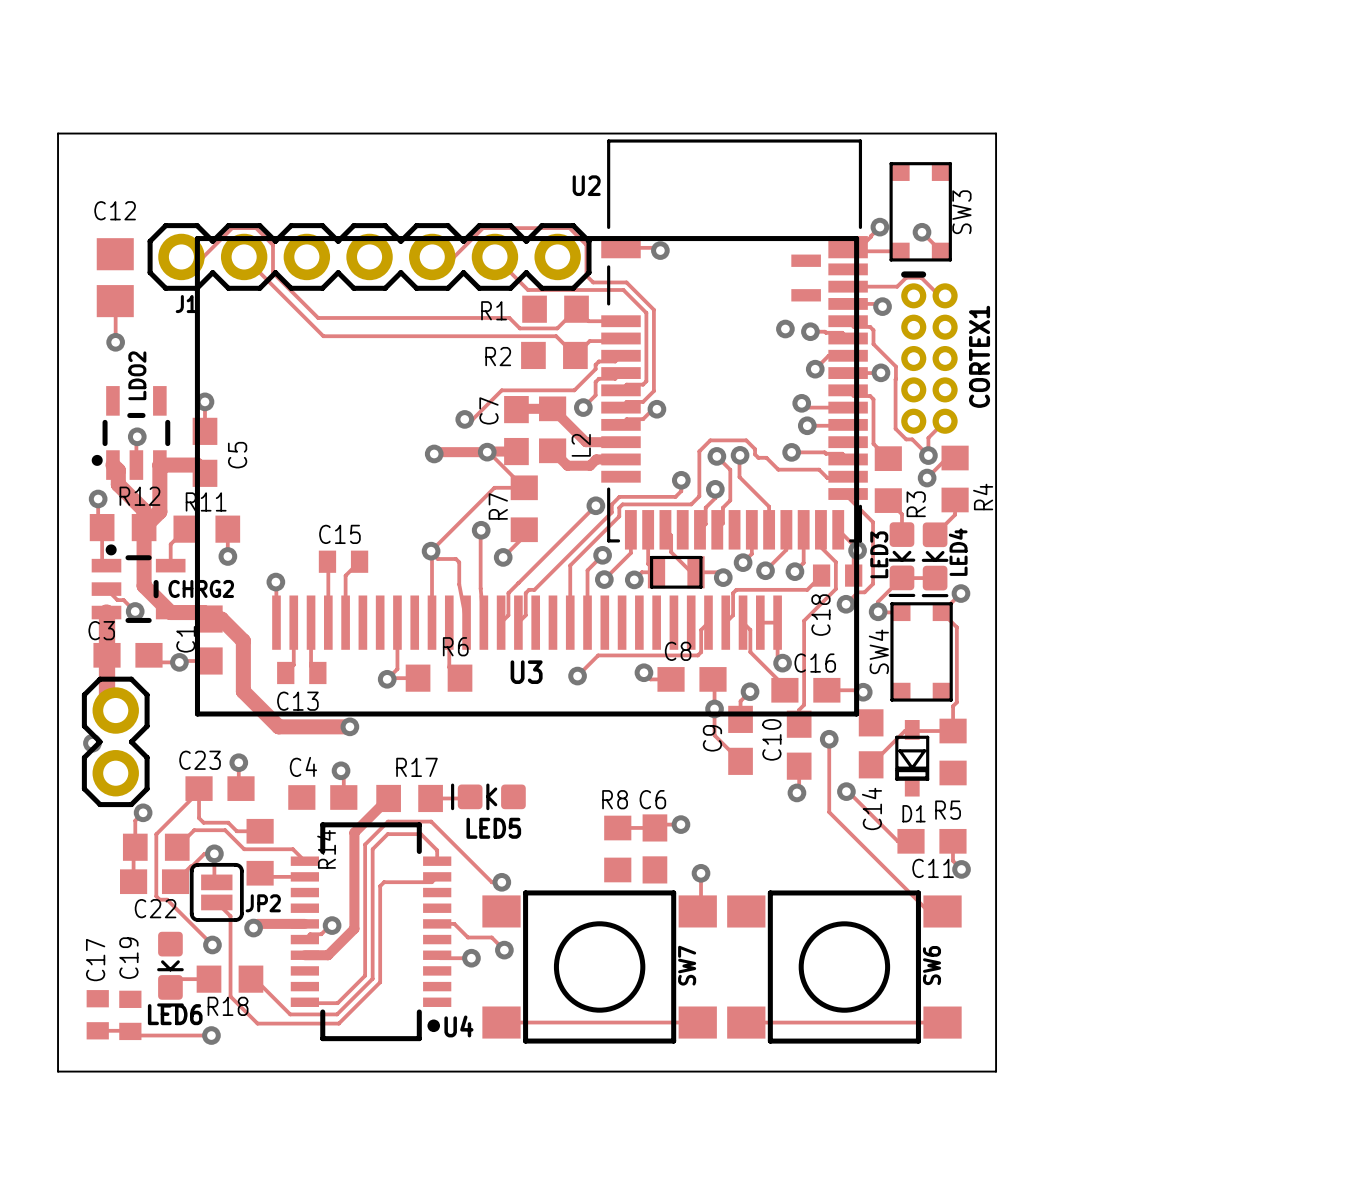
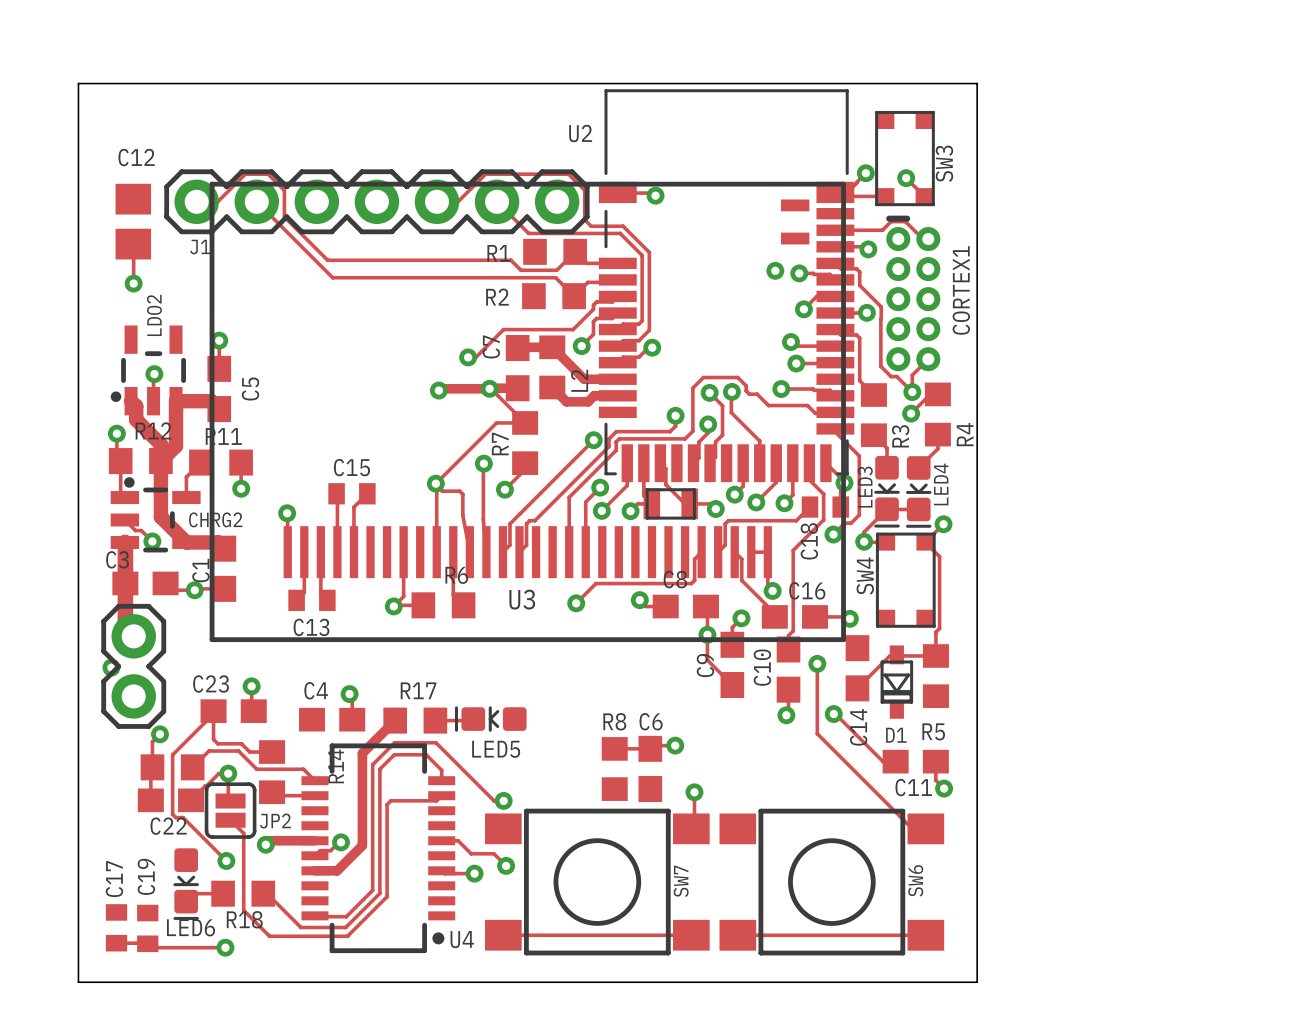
track: (210, 619) (221, 619) (243, 641) (243, 691) (278, 726) (349, 726) -> none
via: (349, 726) -> none

